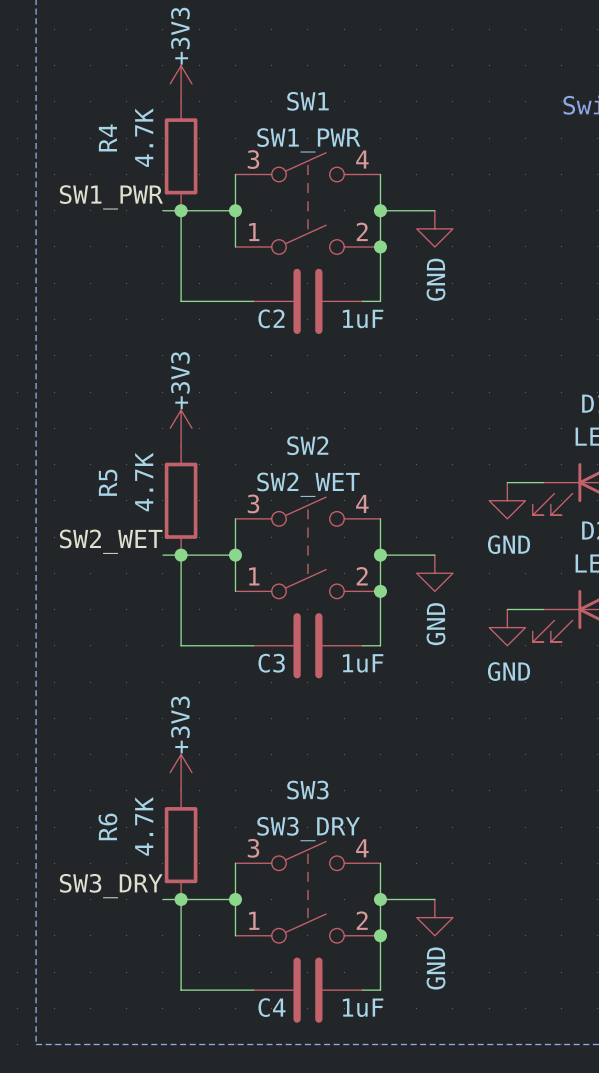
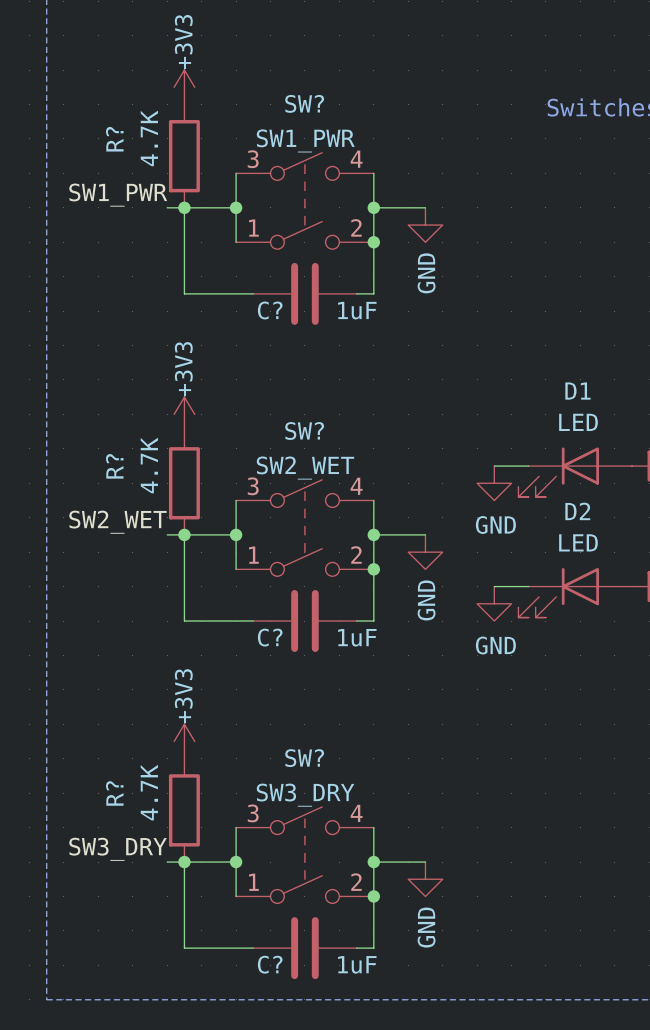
SW1 name: SW1 (307, 101) -> SW? (304, 103)
R4 name: R4 (107, 137) -> R? (114, 139)
C2 name: C2 (271, 318) -> C? (270, 310)
SW2 name: SW2 (307, 445) -> SW? (304, 430)
R5 name: R5 (108, 482) -> R? (114, 466)
C3 name: C3 (271, 663) -> C? (270, 637)
SW3 name: SW3 (307, 790) -> SW? (304, 758)
R6 name: R6 (107, 826) -> R? (114, 793)
C4 name: C4 (271, 1007) -> C? (270, 964)

